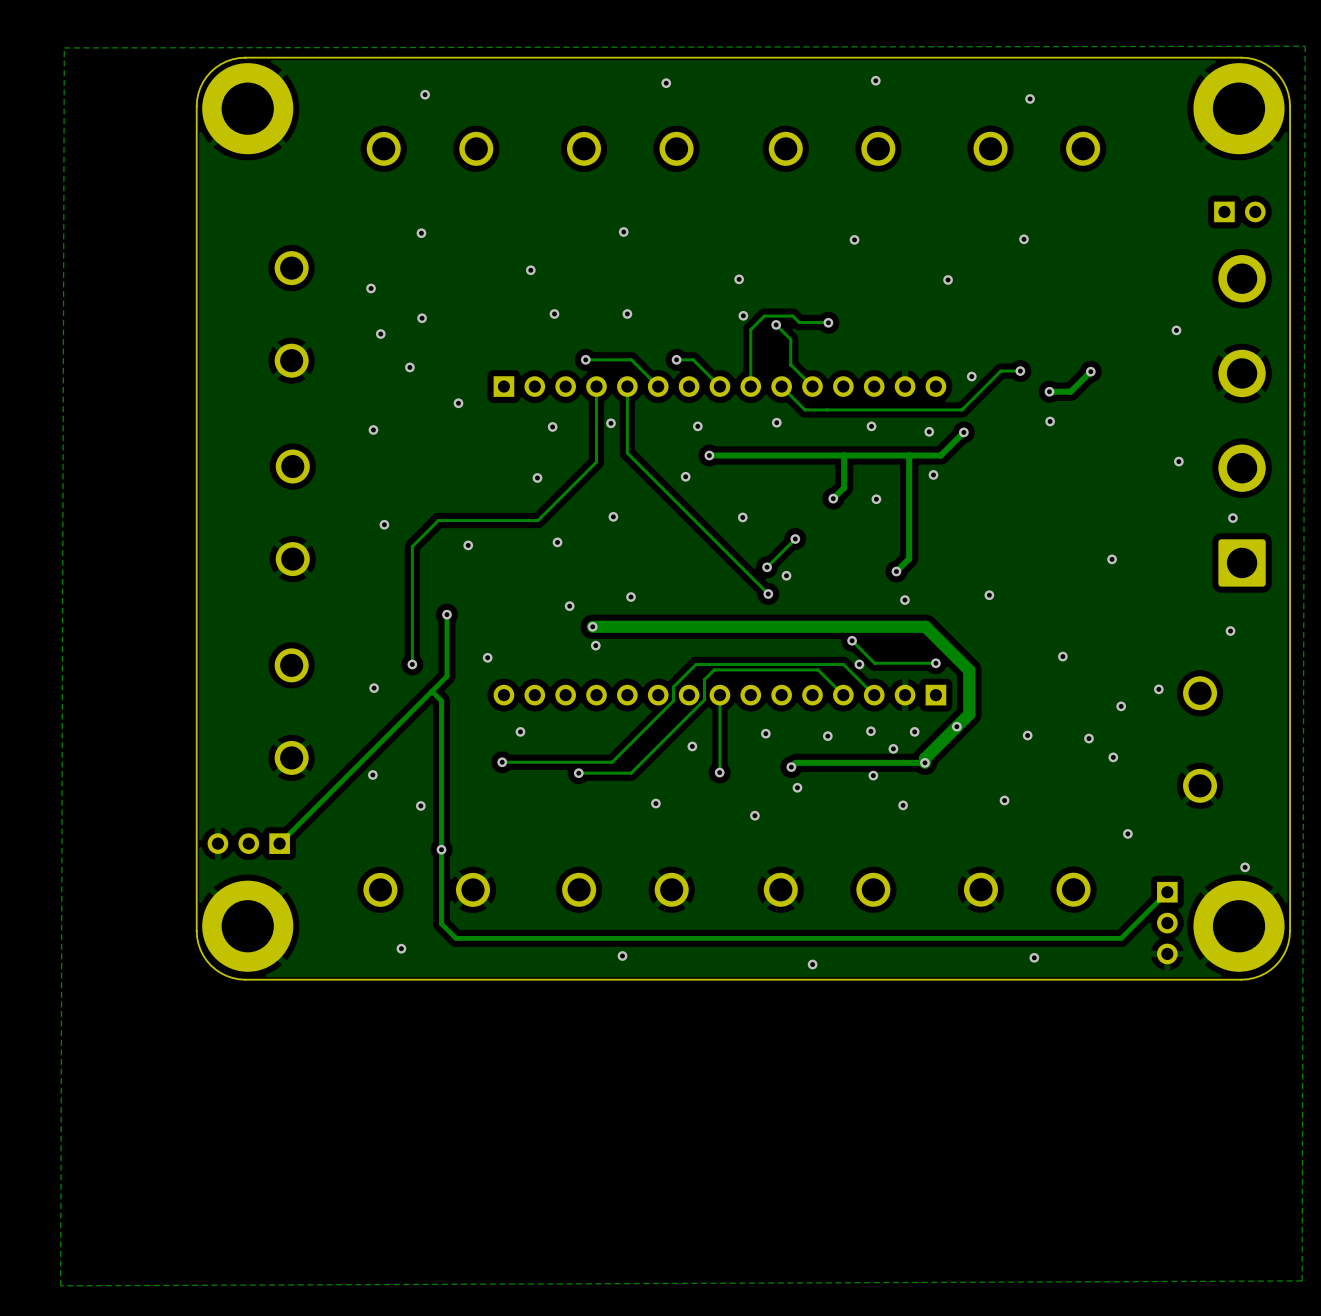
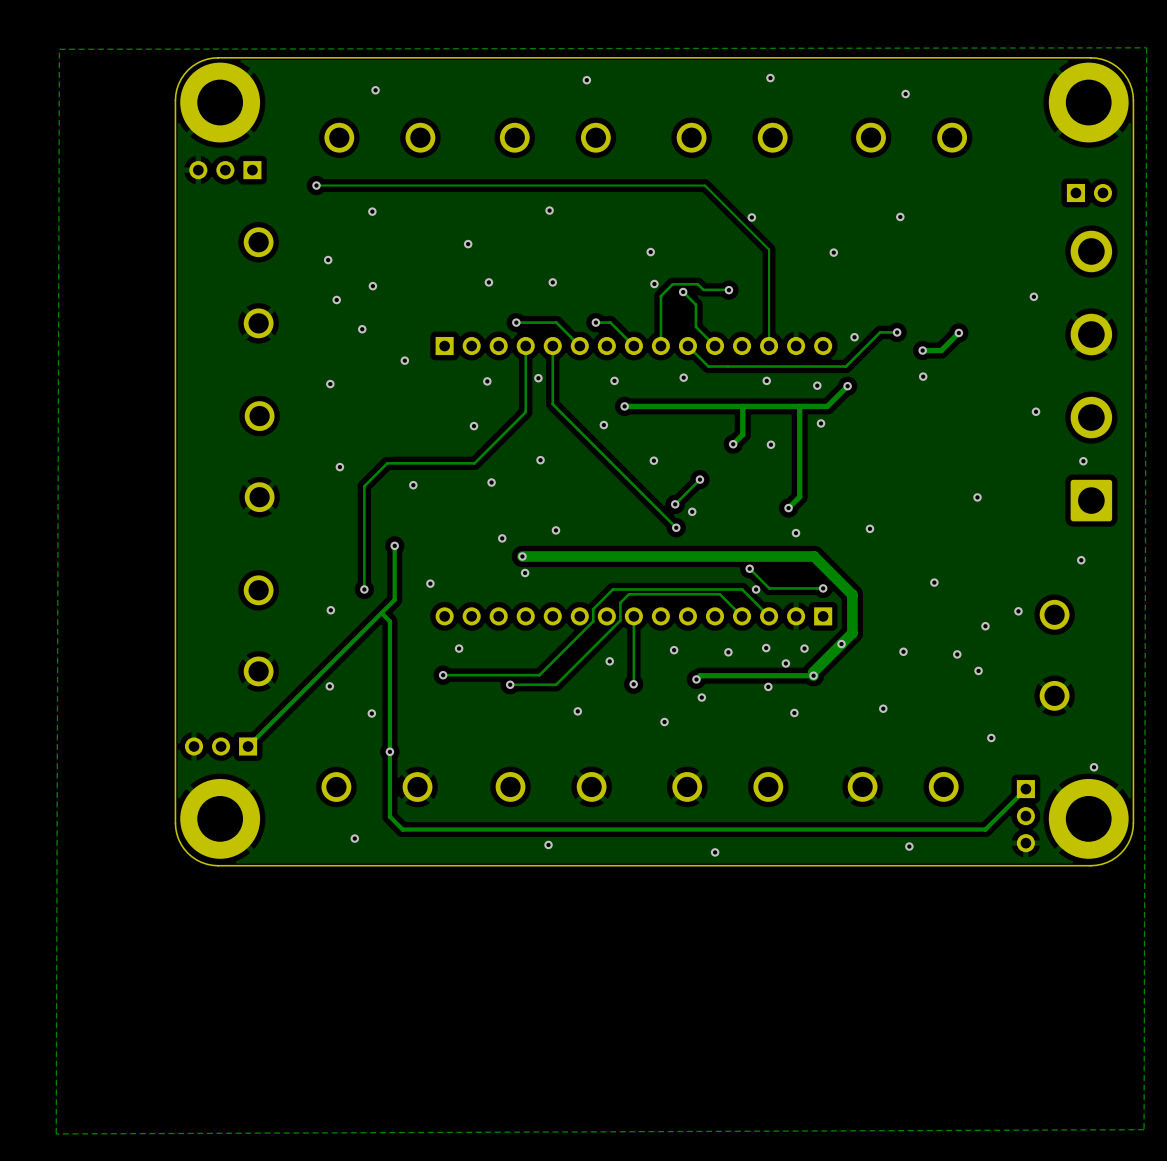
part: none -> (225, 170)
track: none -> (316, 185) (704, 185) (769, 249) (769, 346)
via: none -> (316, 185)

